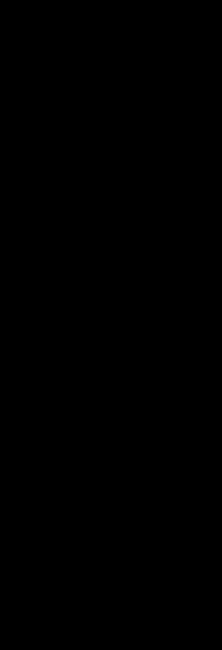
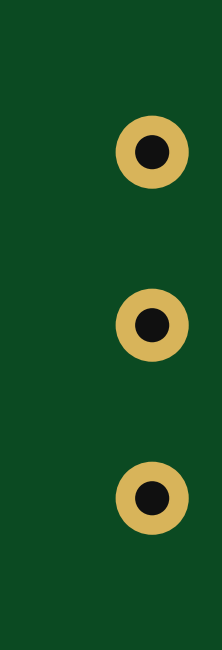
part: none -> (152, 152)
part: none -> (152, 325)
part: none -> (152, 498)

